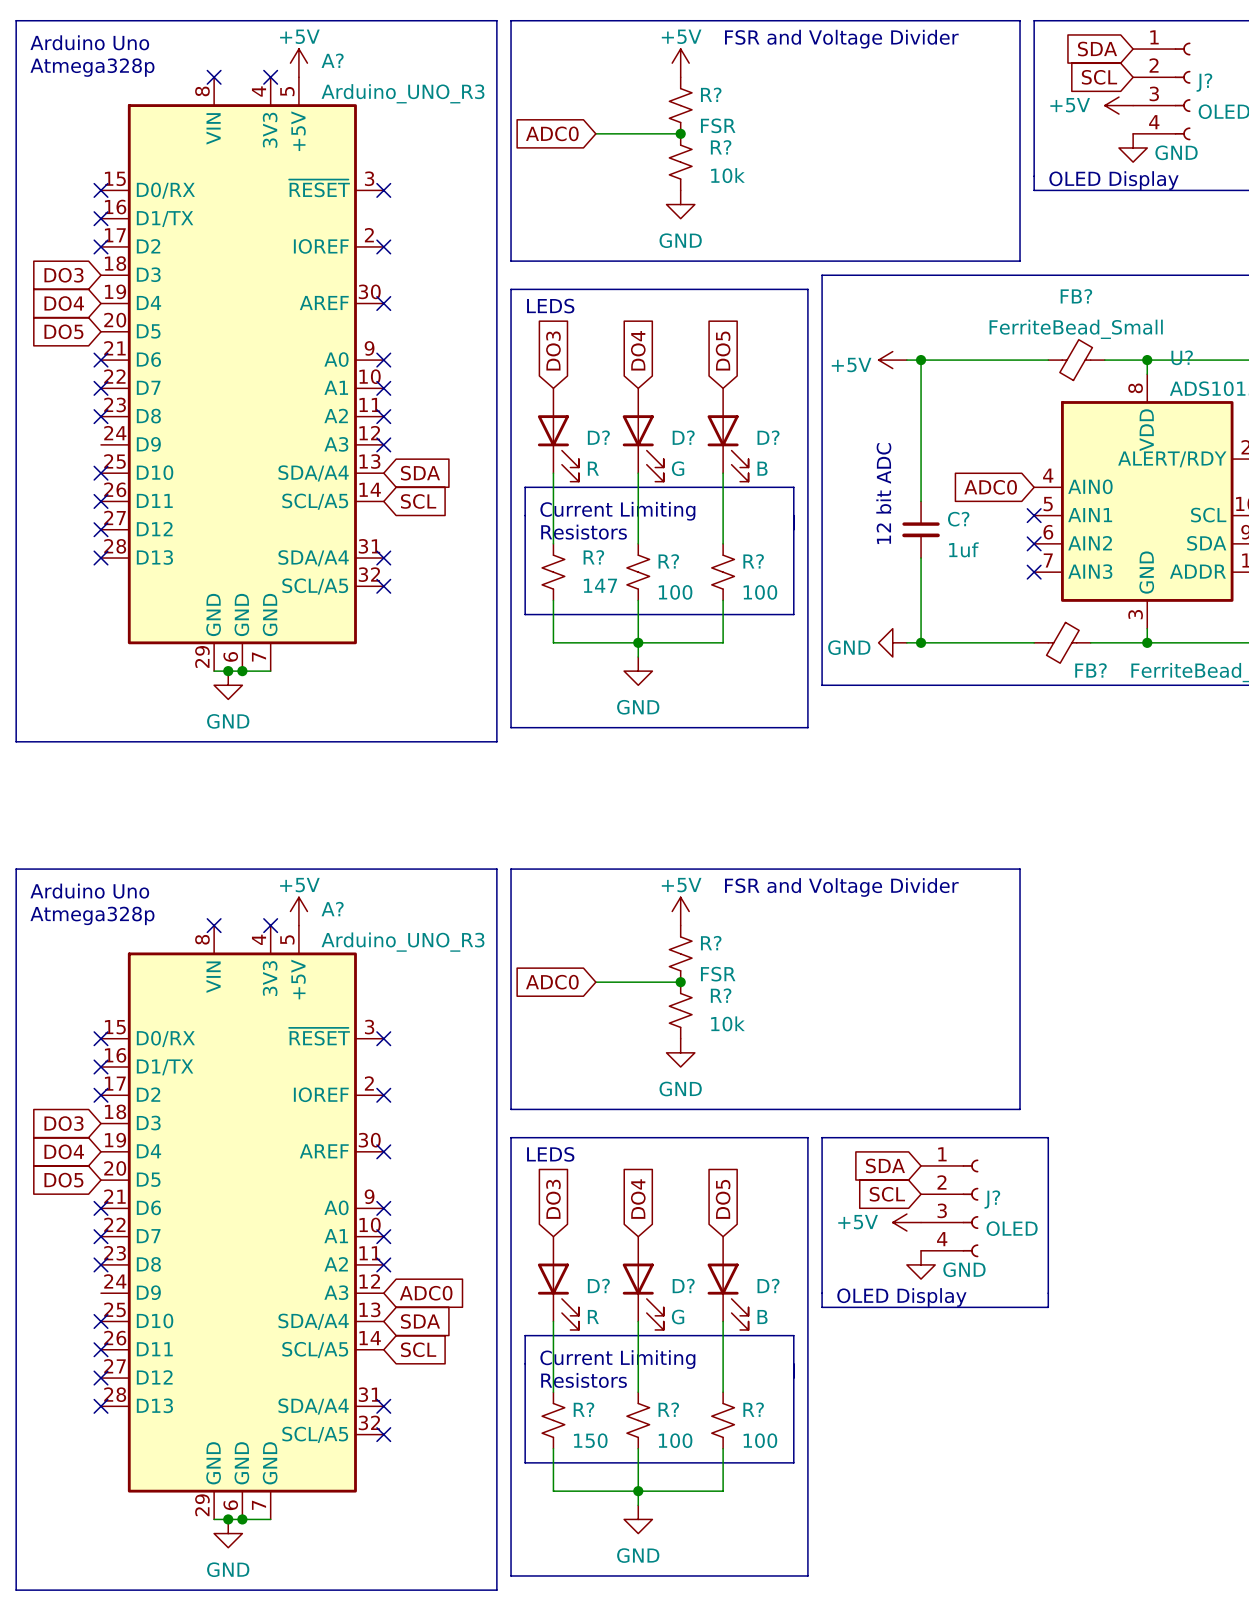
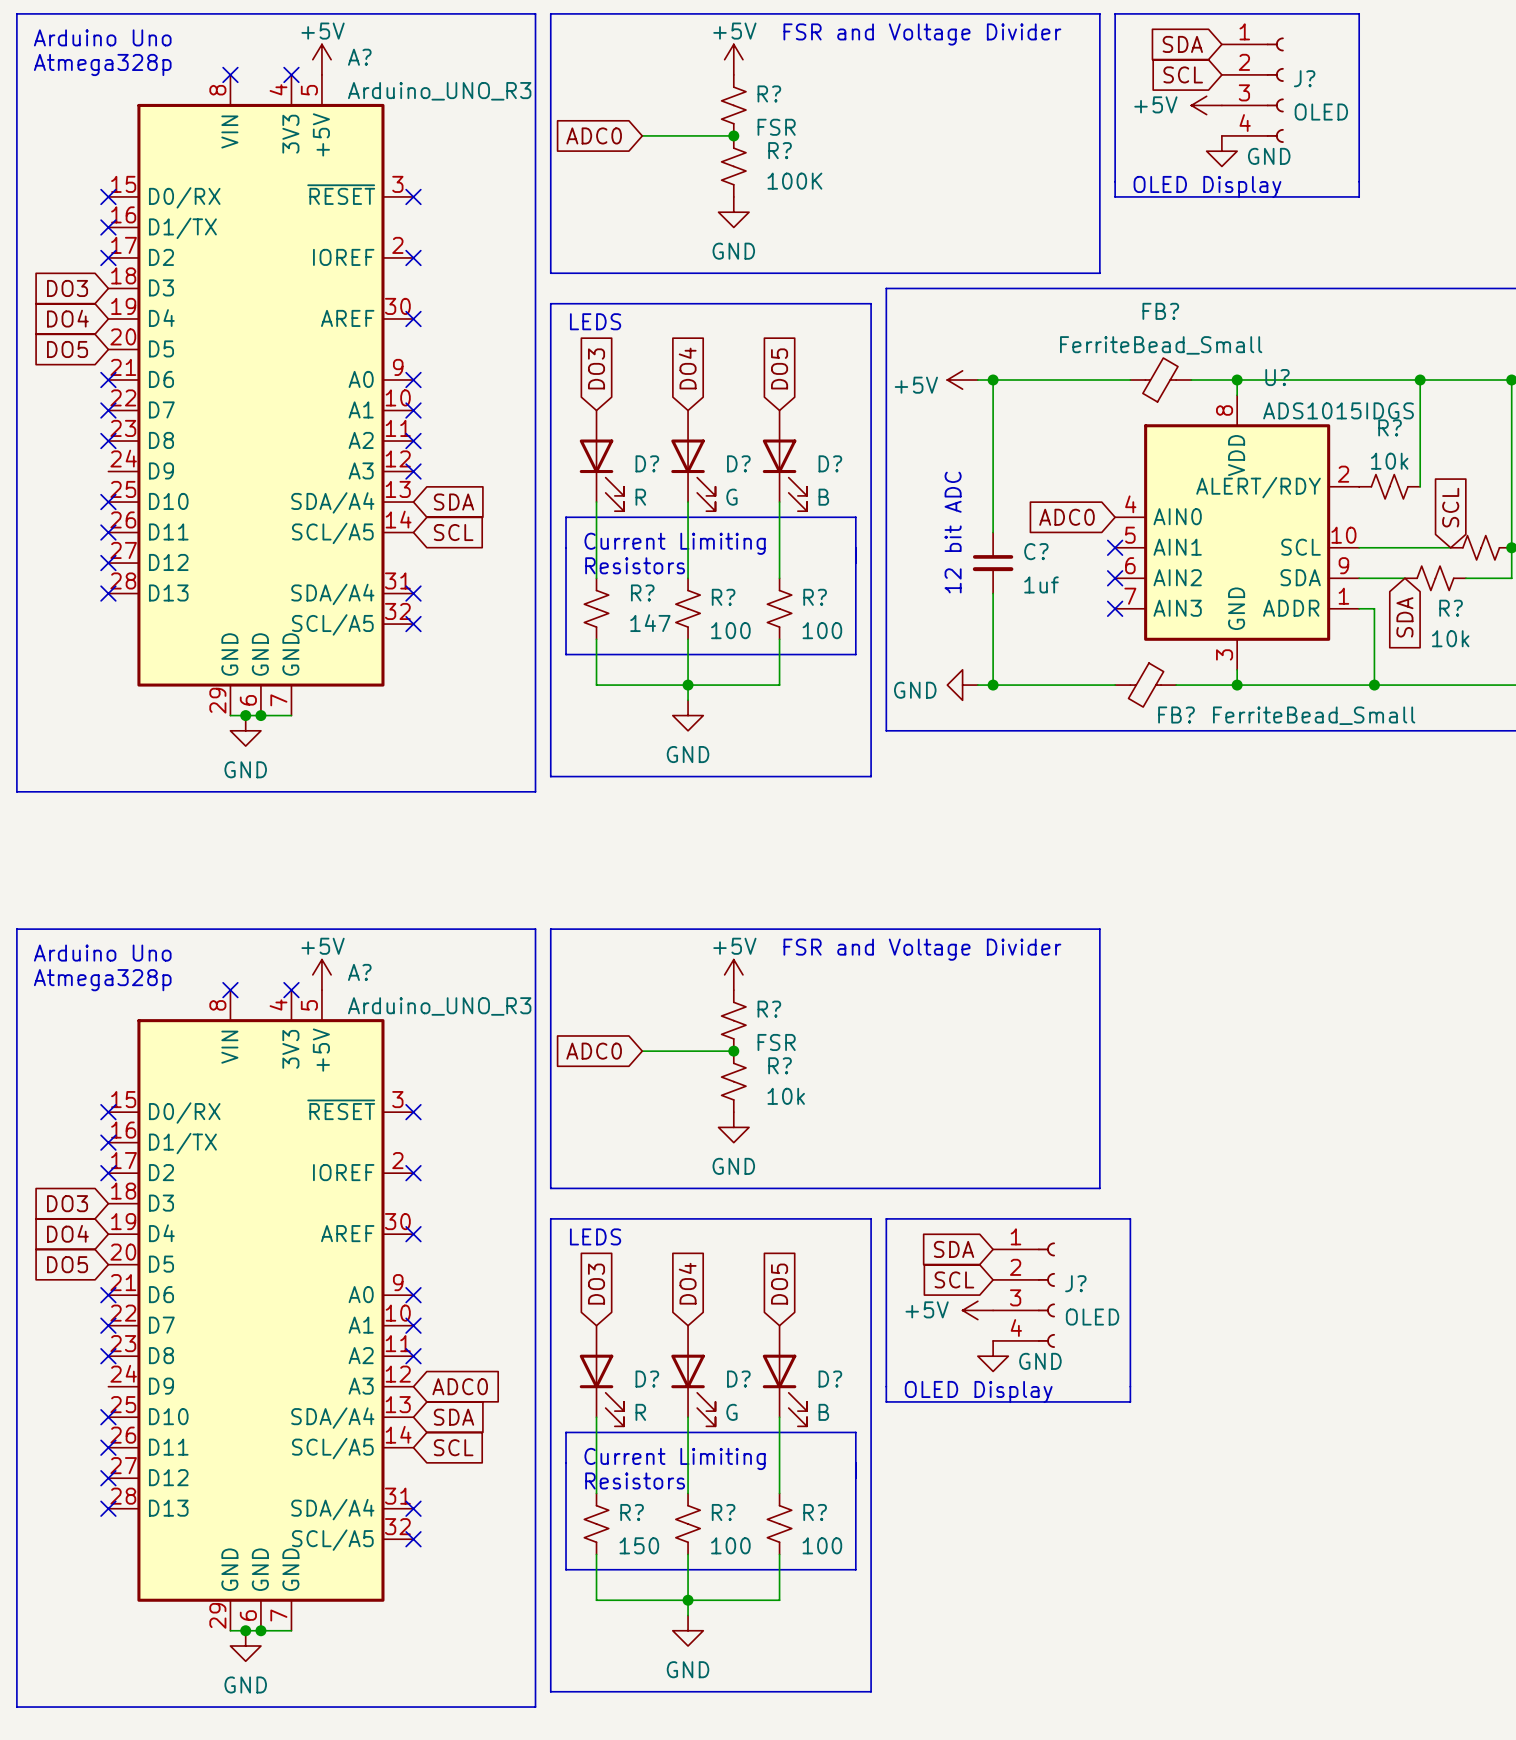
R? value: 10k (727, 175) -> 100K (794, 181)

